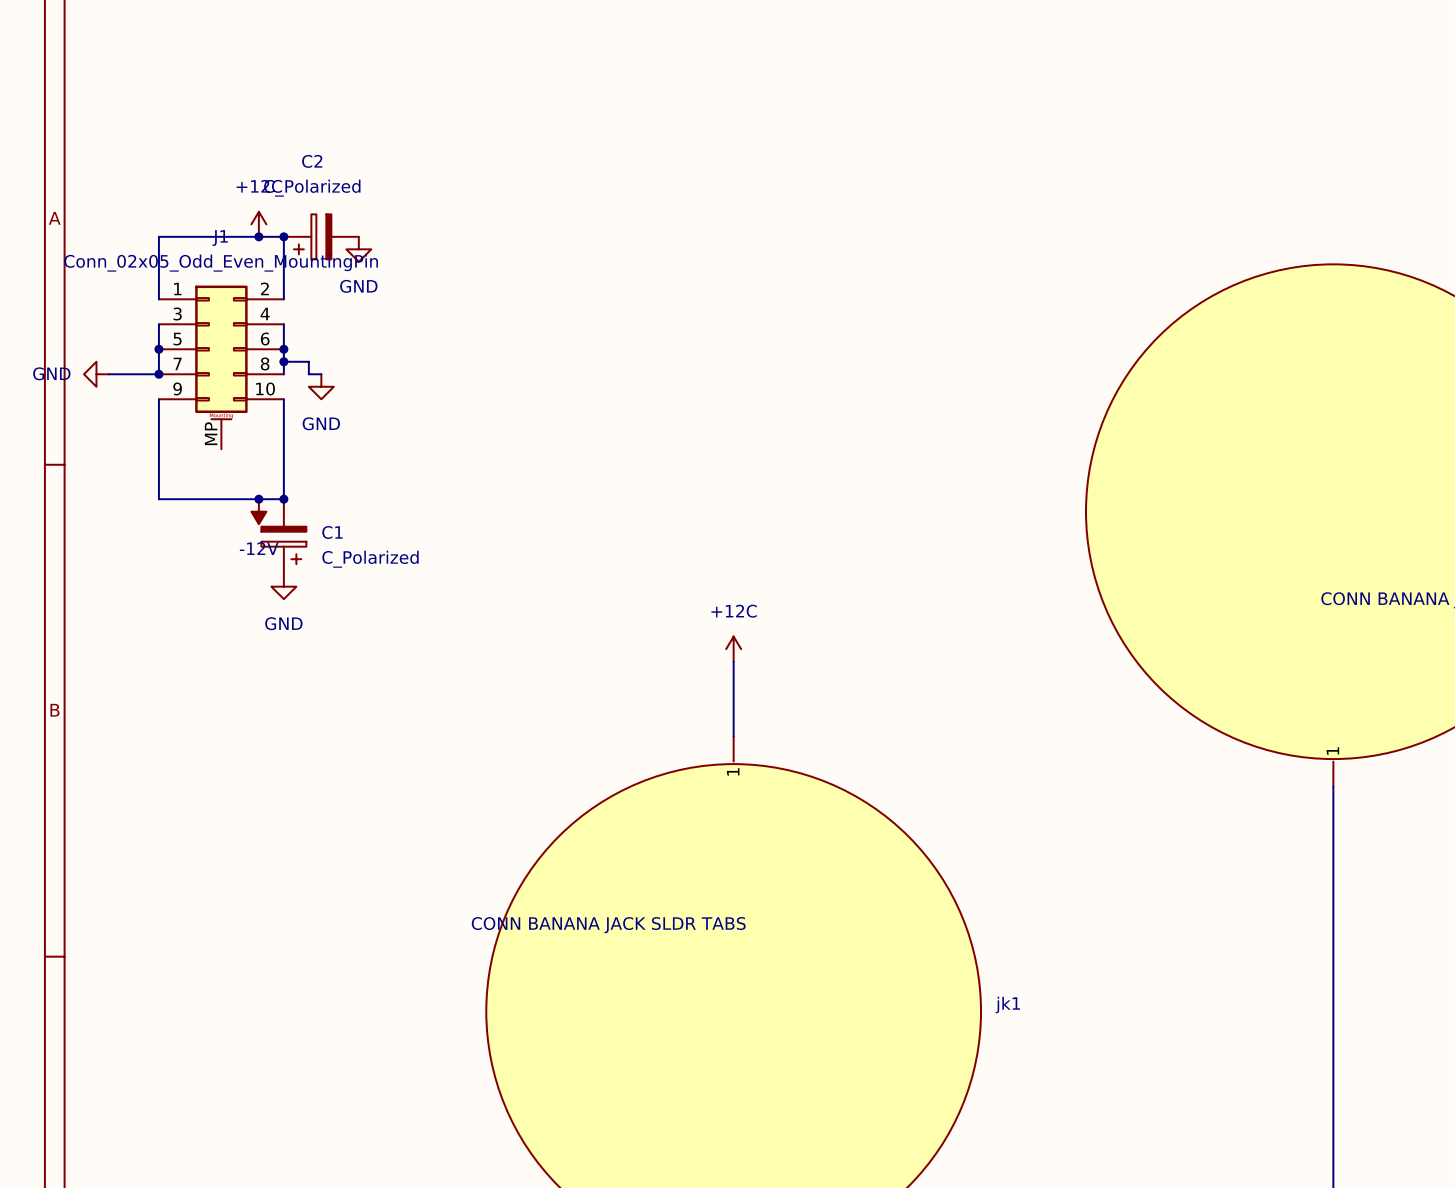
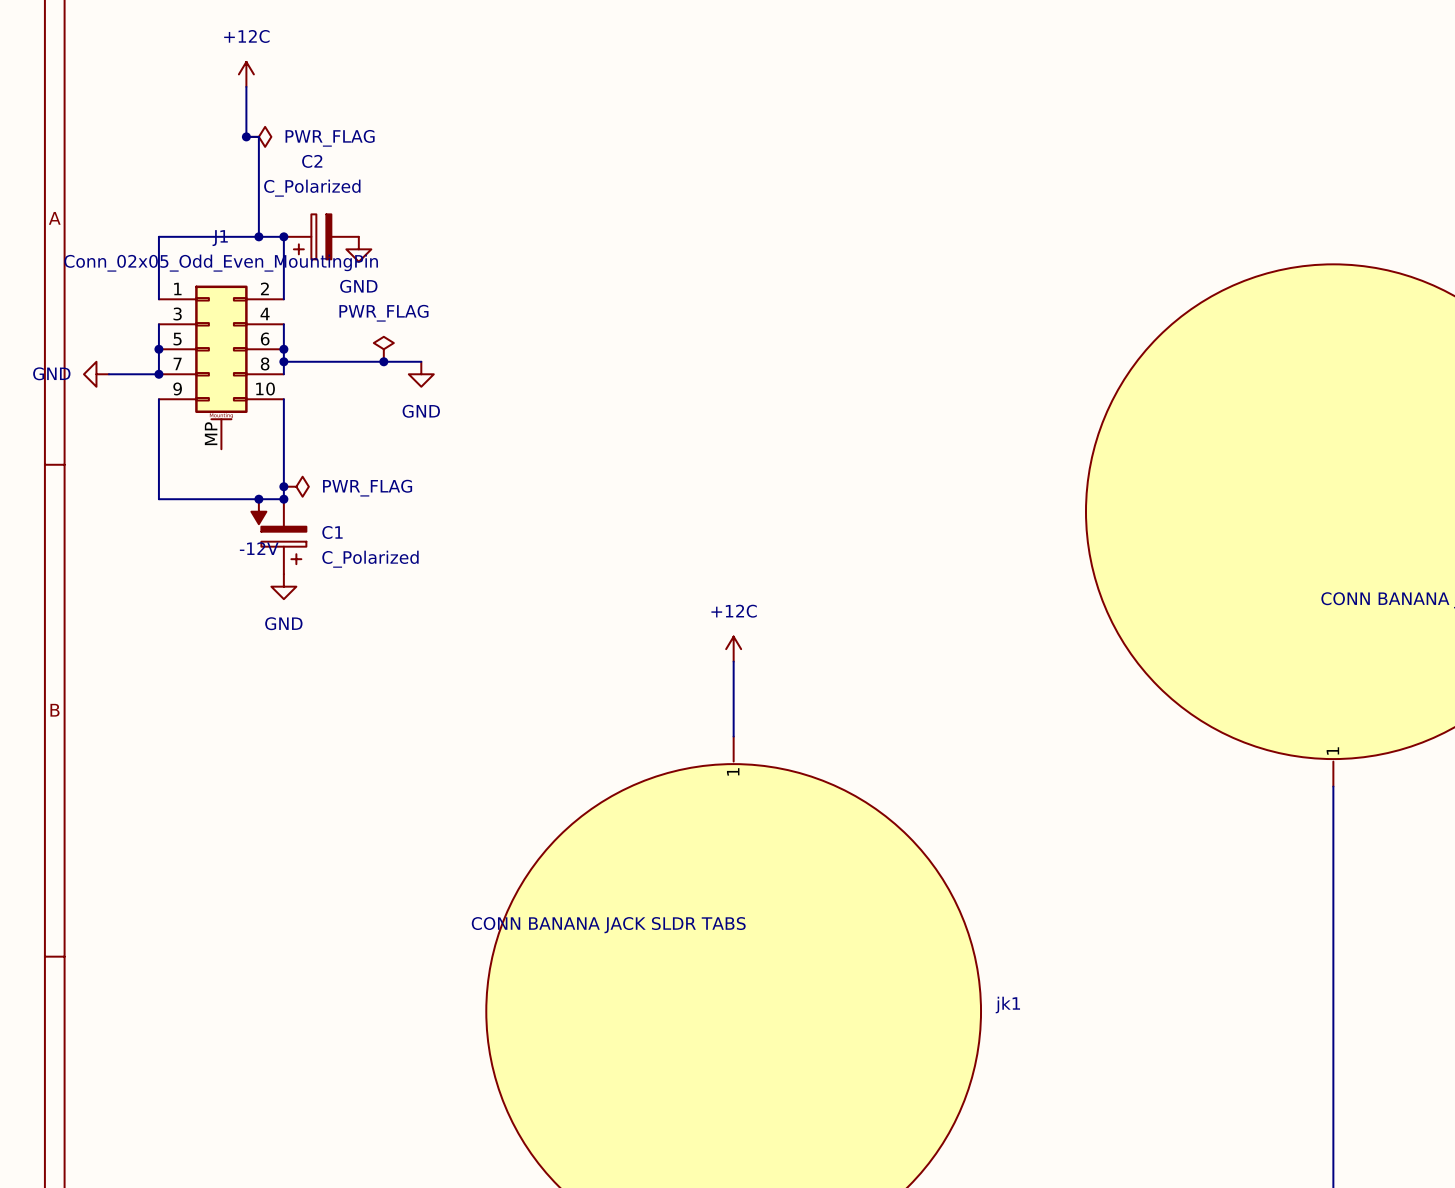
wire: none -> (246, 86) (246, 136) (258, 136) (258, 236)
junction: none -> (246, 136)
power symbol: none -> PWR_FLAG (258, 136)
power symbol position: +12C (258, 224) -> +12C (246, 74)
power symbol: none -> PWR_FLAG (383, 349)
wire: (308, 361) (308, 374) (321, 374) -> (308, 361) (421, 361)
junction: none -> (383, 361)
power symbol position: GND (321, 386) -> GND (421, 374)
junction: none -> (283, 486)
power symbol: none -> PWR_FLAG (296, 486)

